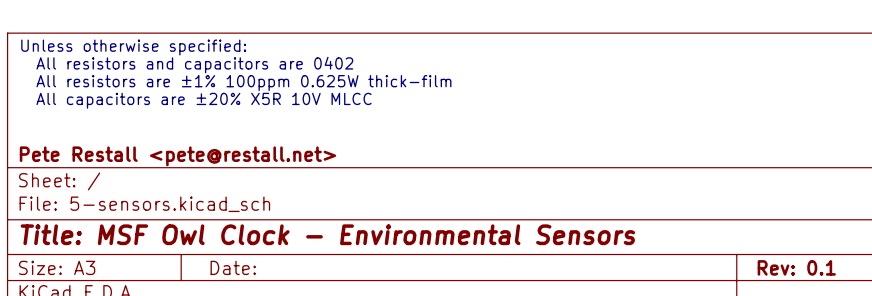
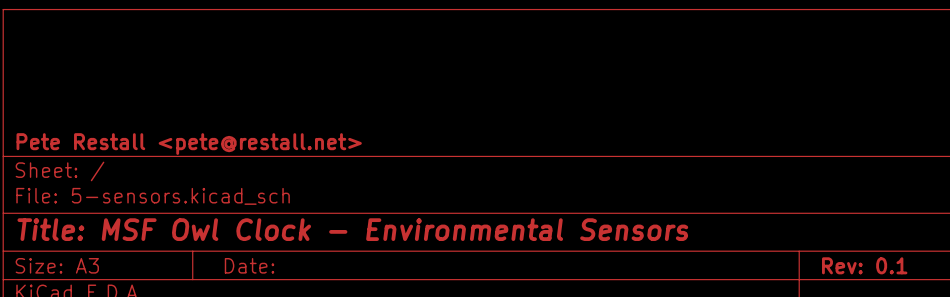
text: Unless otherwise specified: (133, 47) -> none
text: All resistors and capacitors are 0402 (194, 65) -> none
text: All resistors are ±1% 100ppm 0.625W thick-film (243, 83) -> none
text: All capacitors are ±20% X5R 10V MLCC (204, 100) -> none

